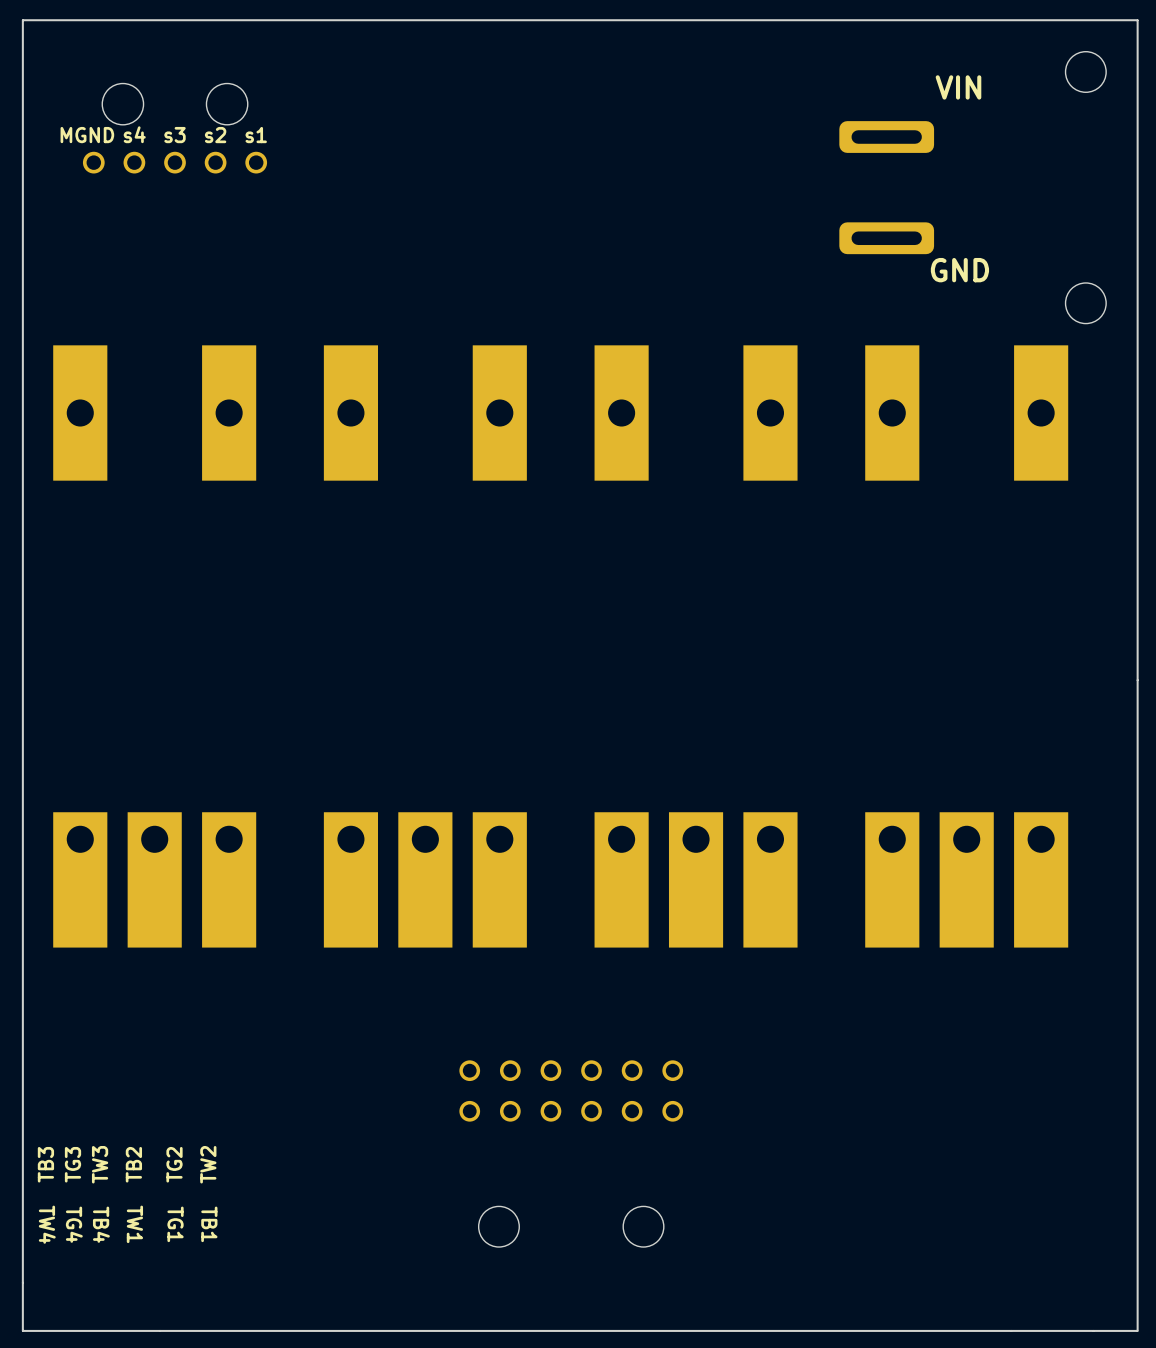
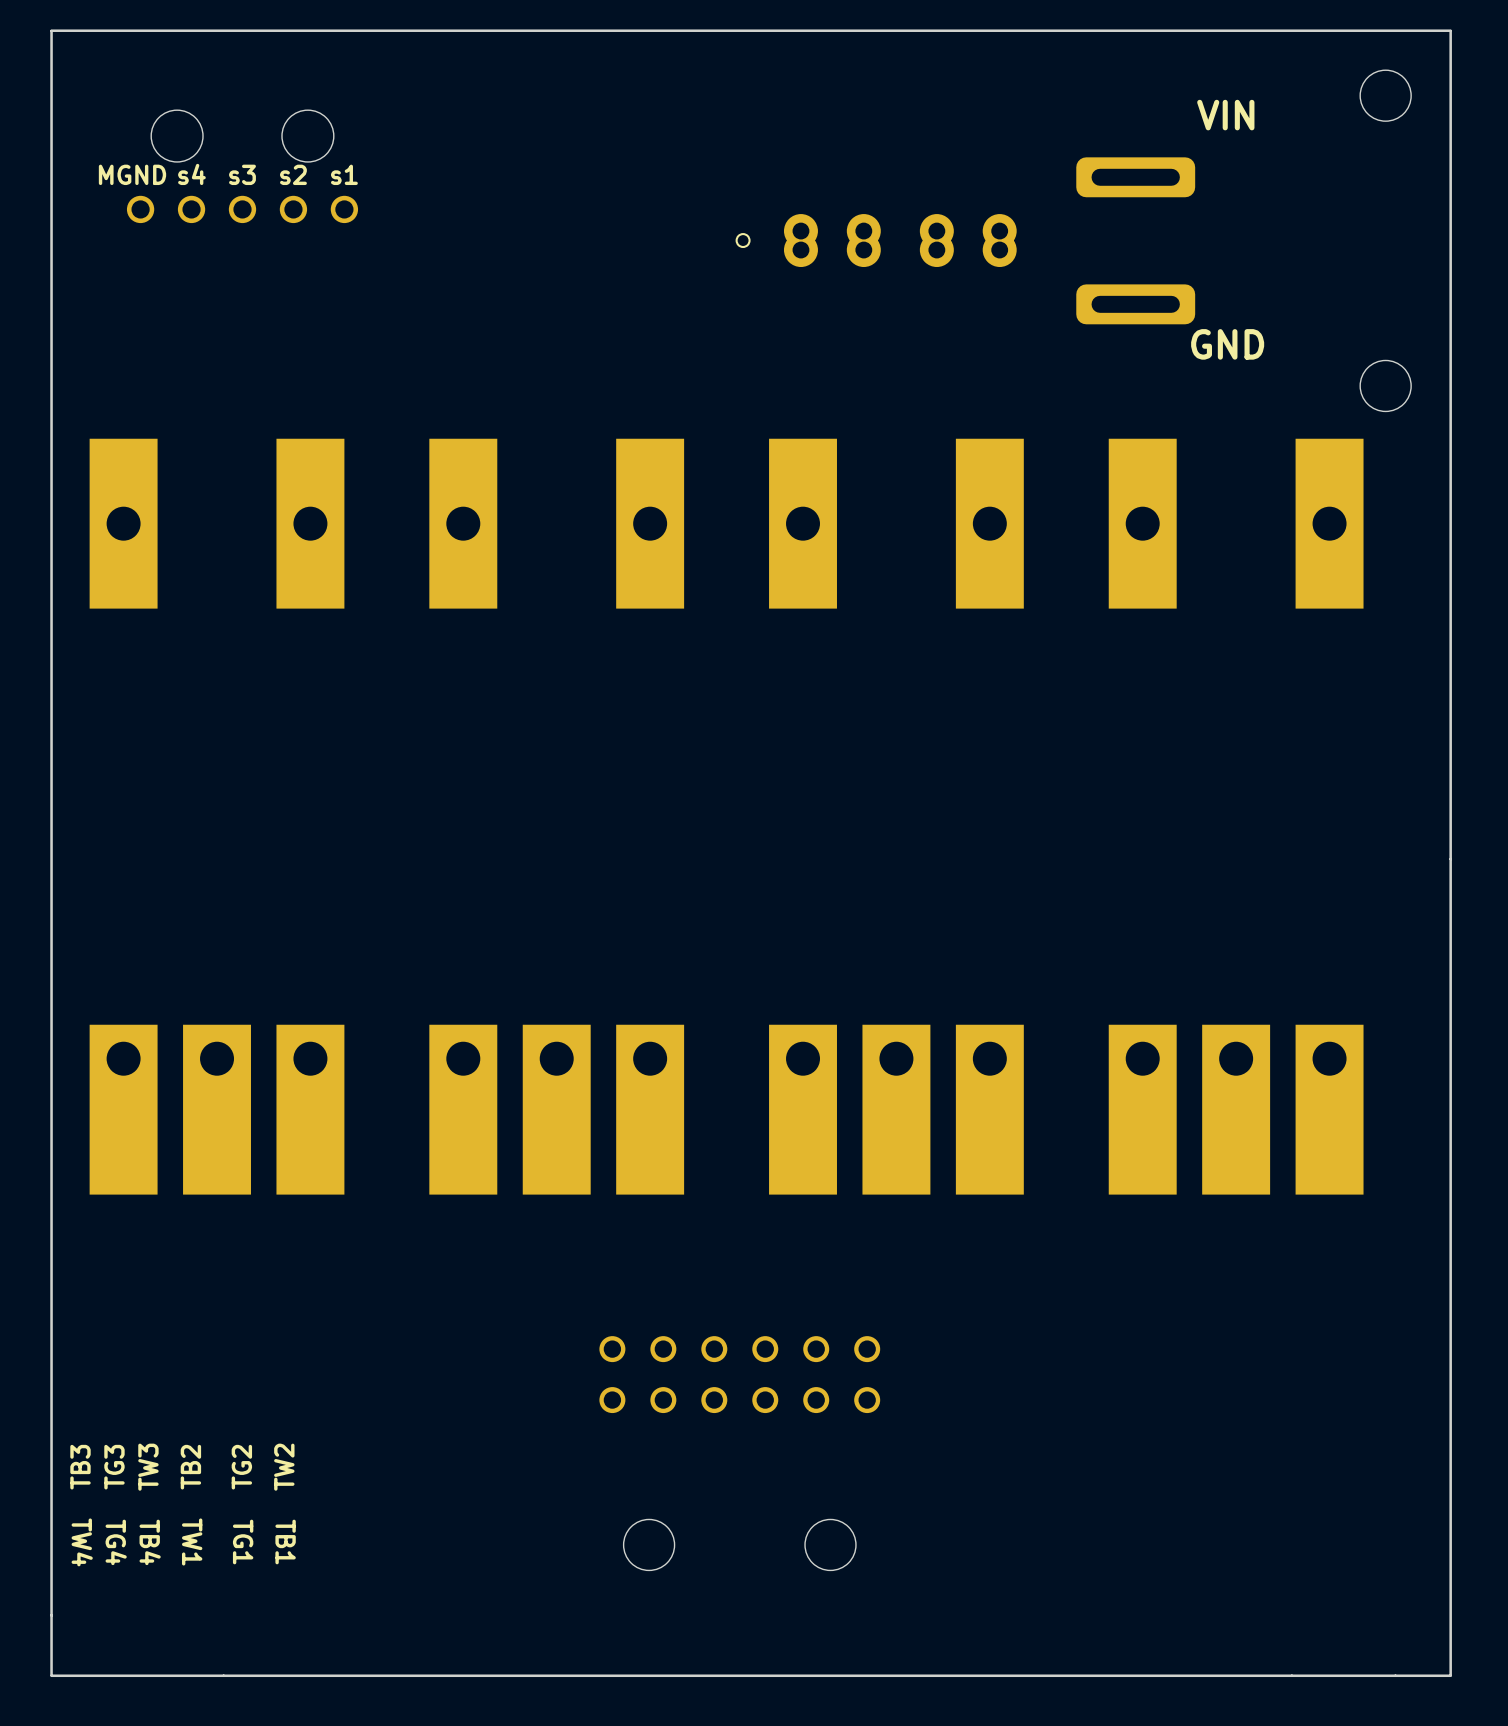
part: none -> (876, 240)

